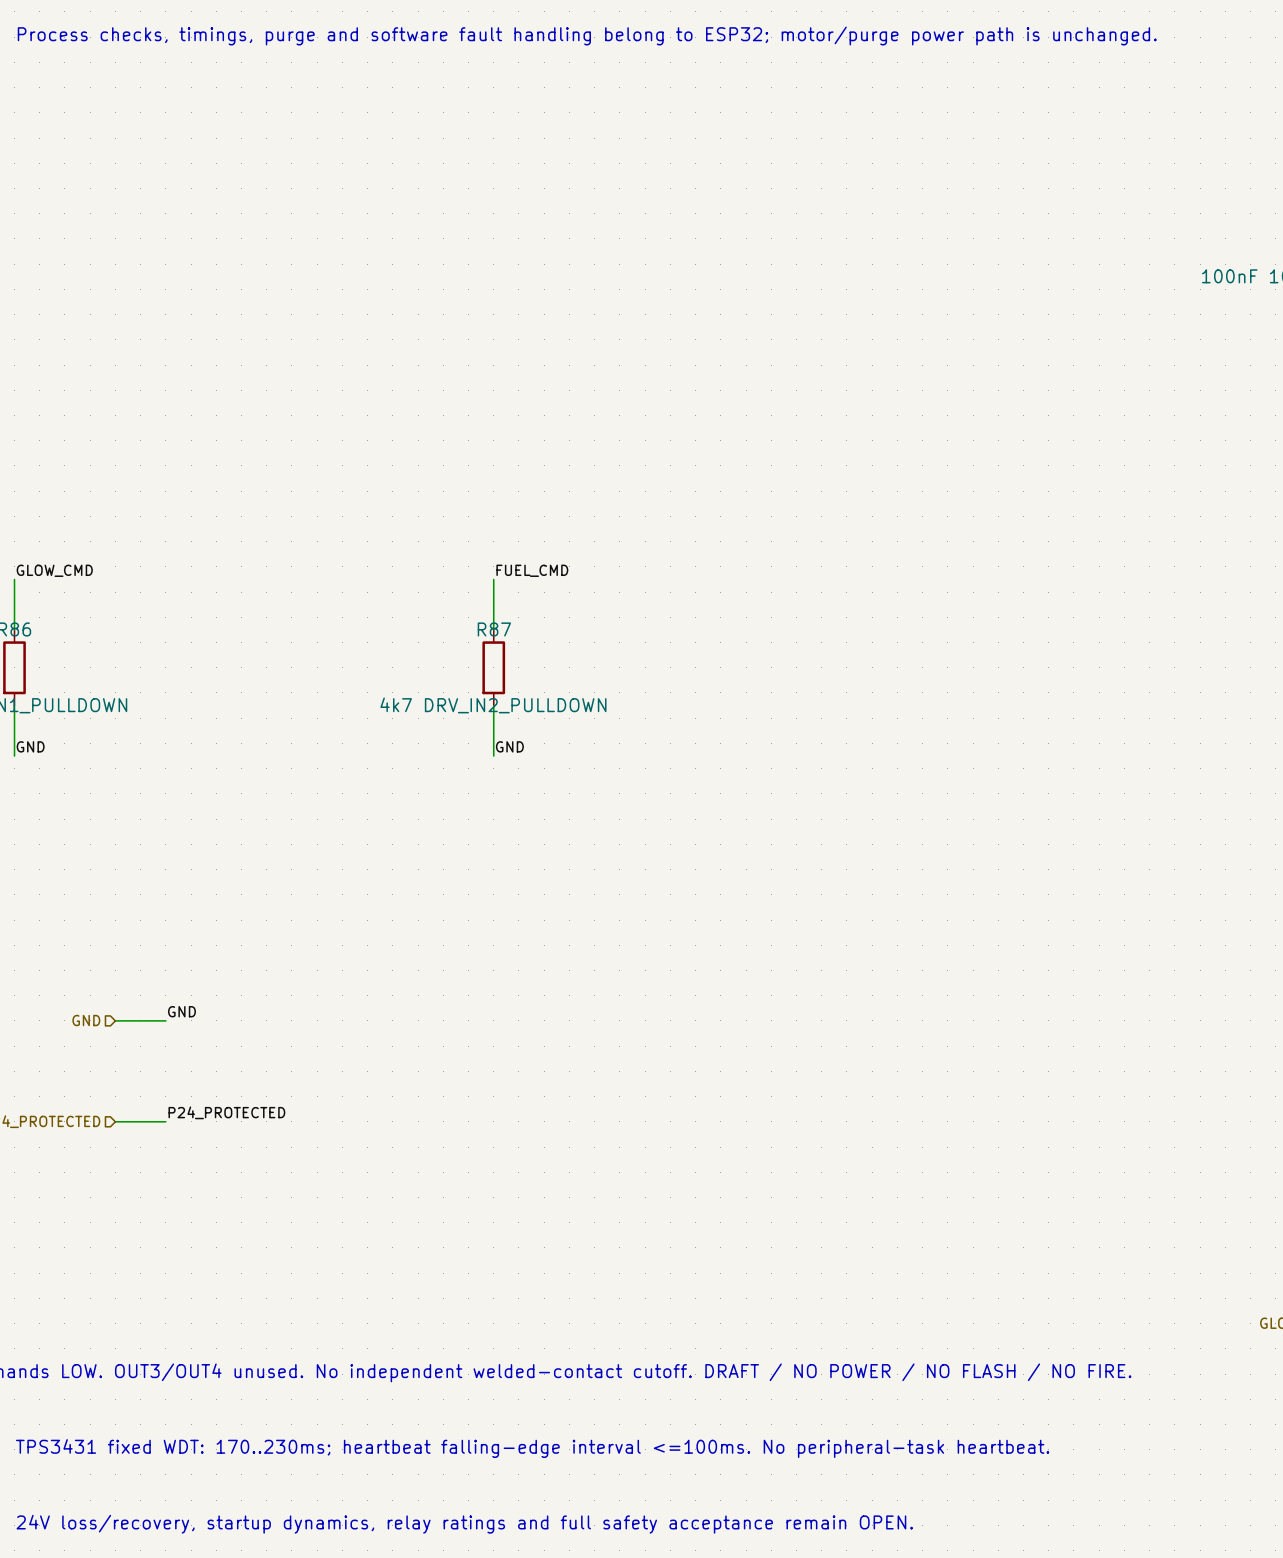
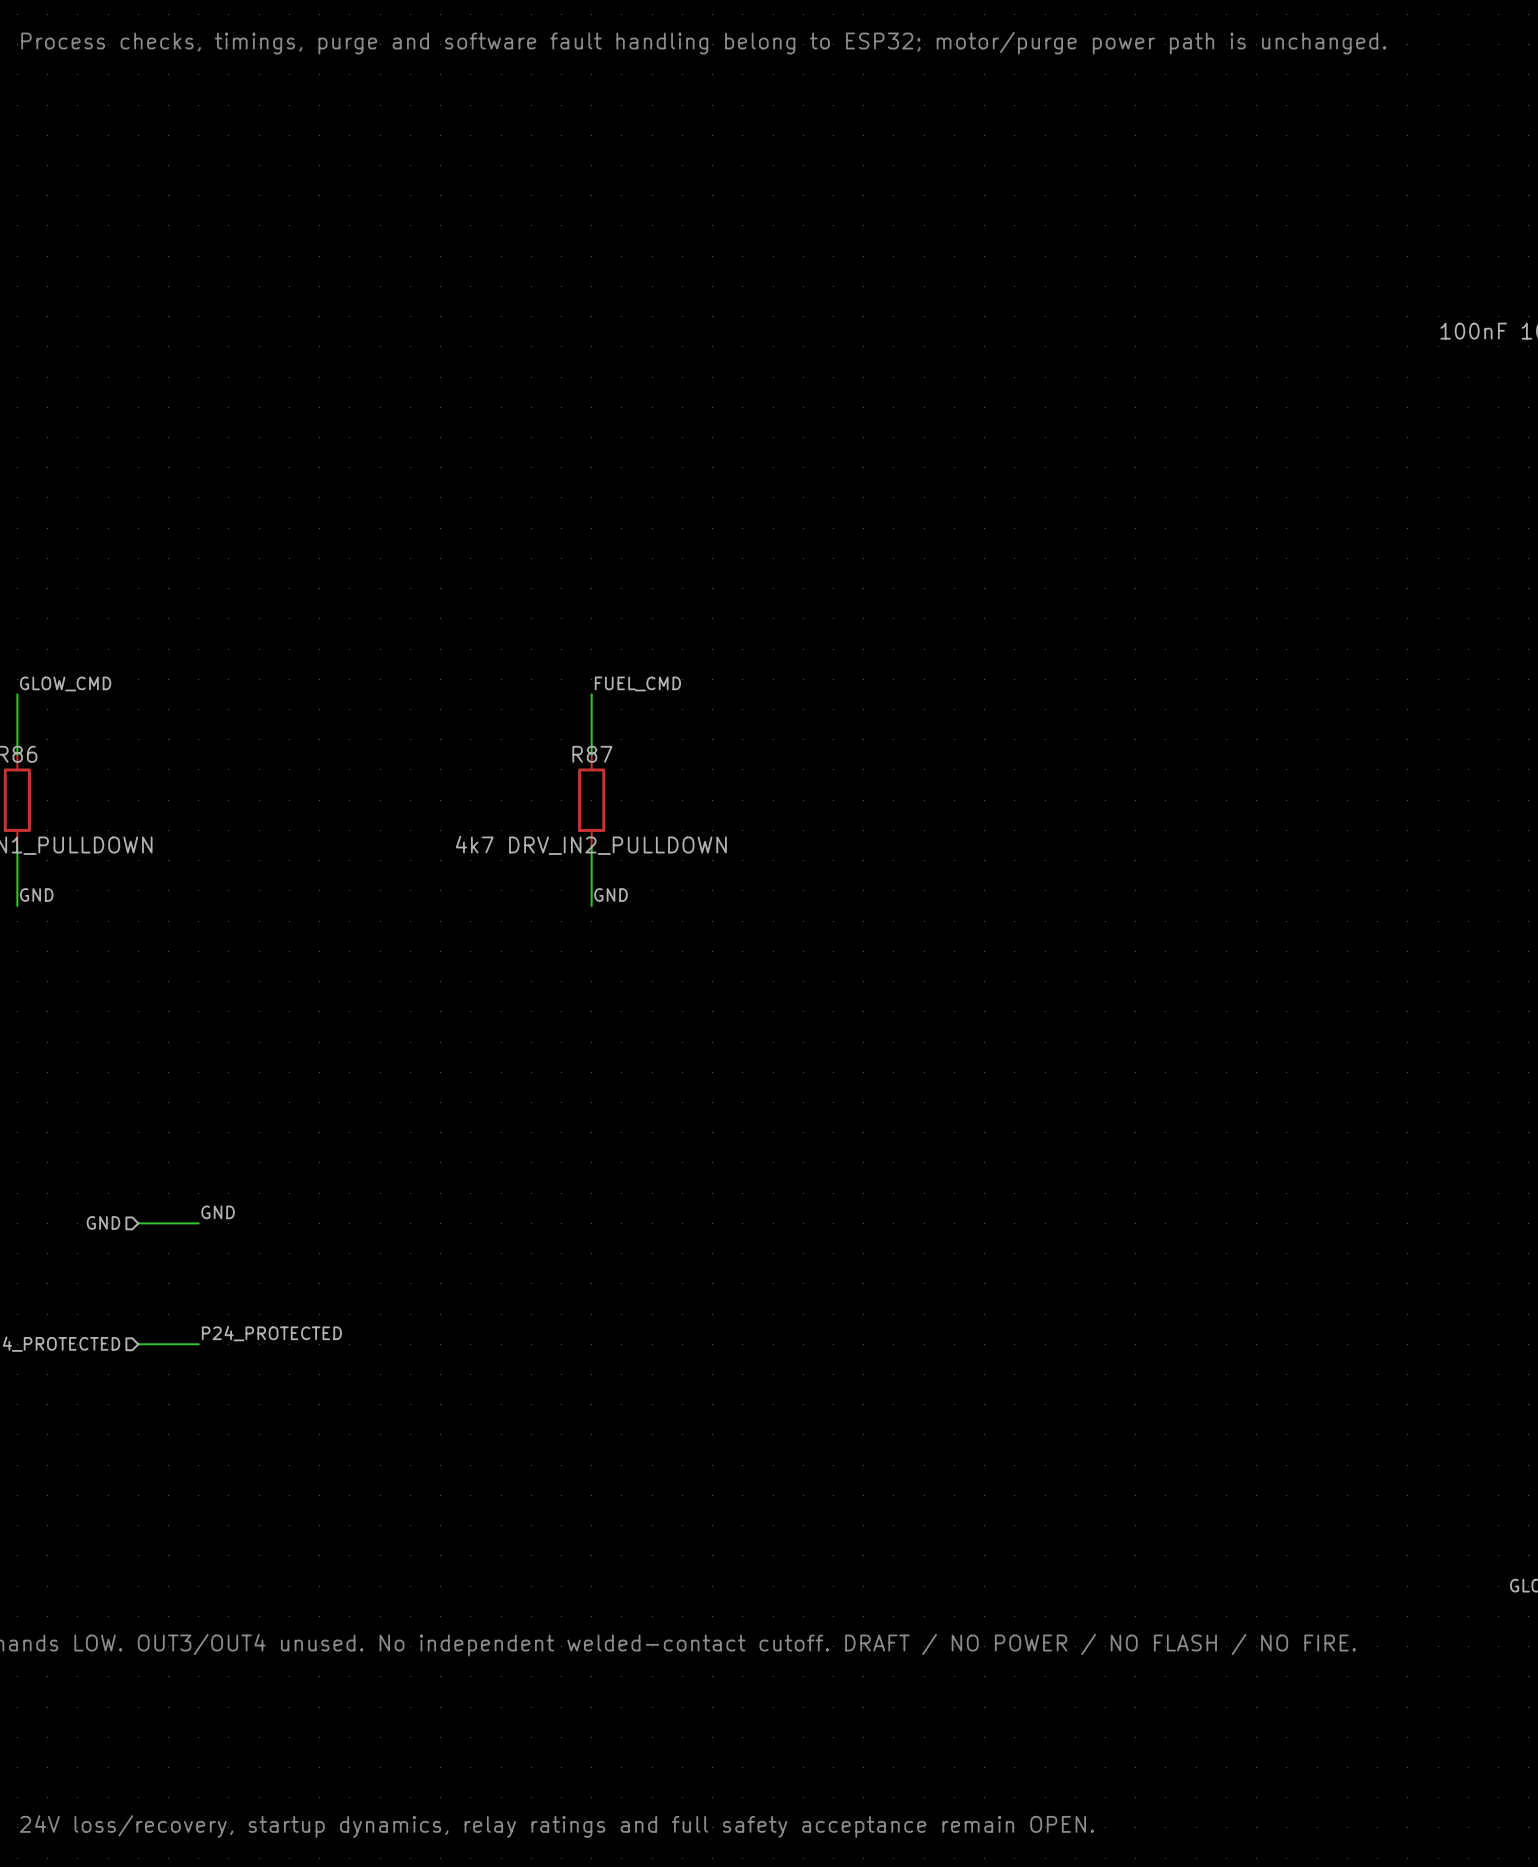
text: TPS3431 fixed WDT: 170..230ms; heartbeat falling-edge interval <=100ms. No peripheral-task heartbeat. (532, 1448) -> none

